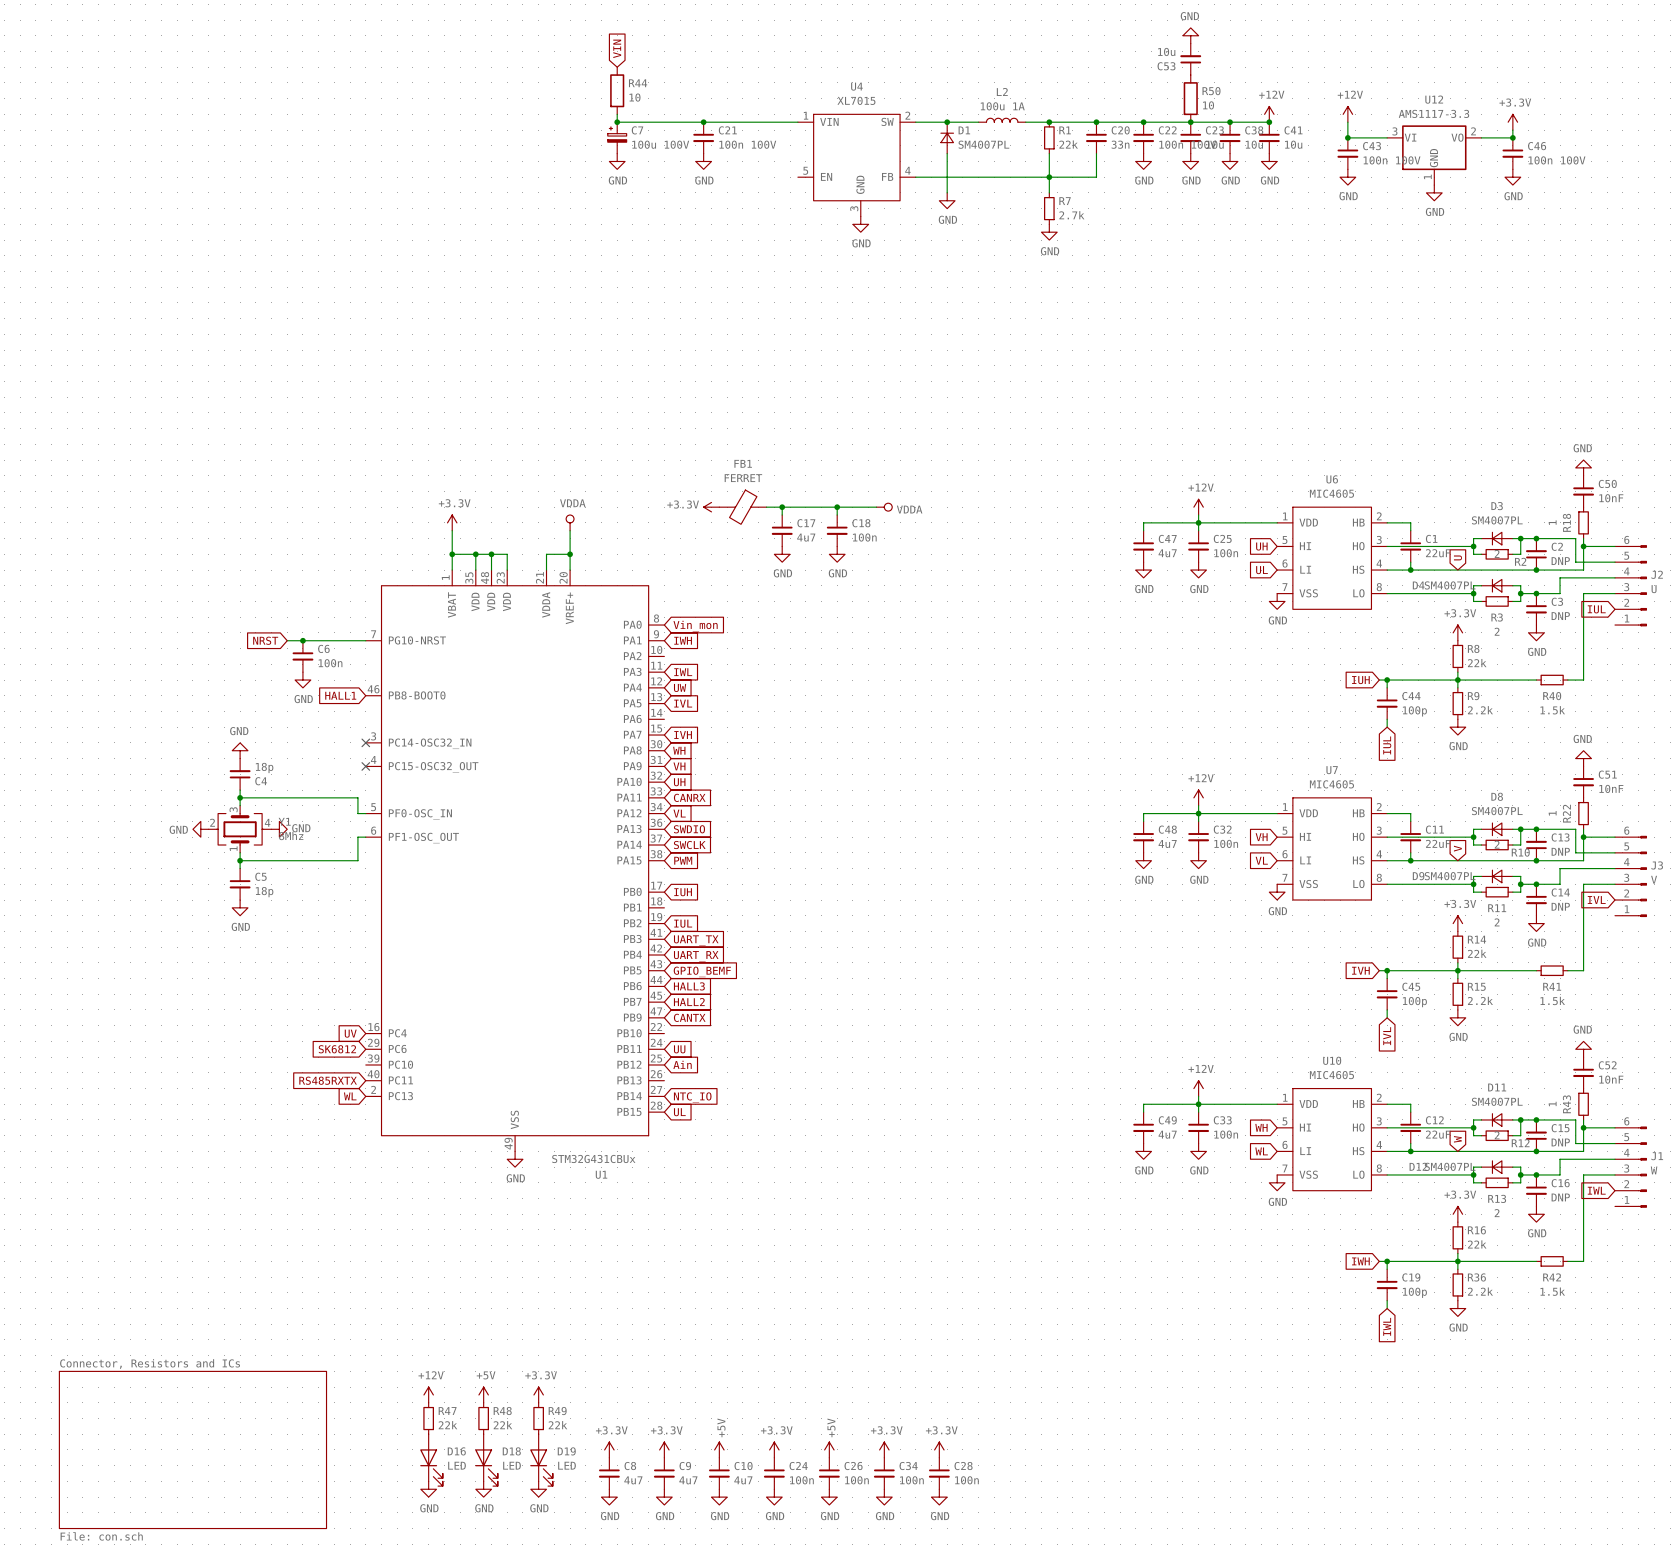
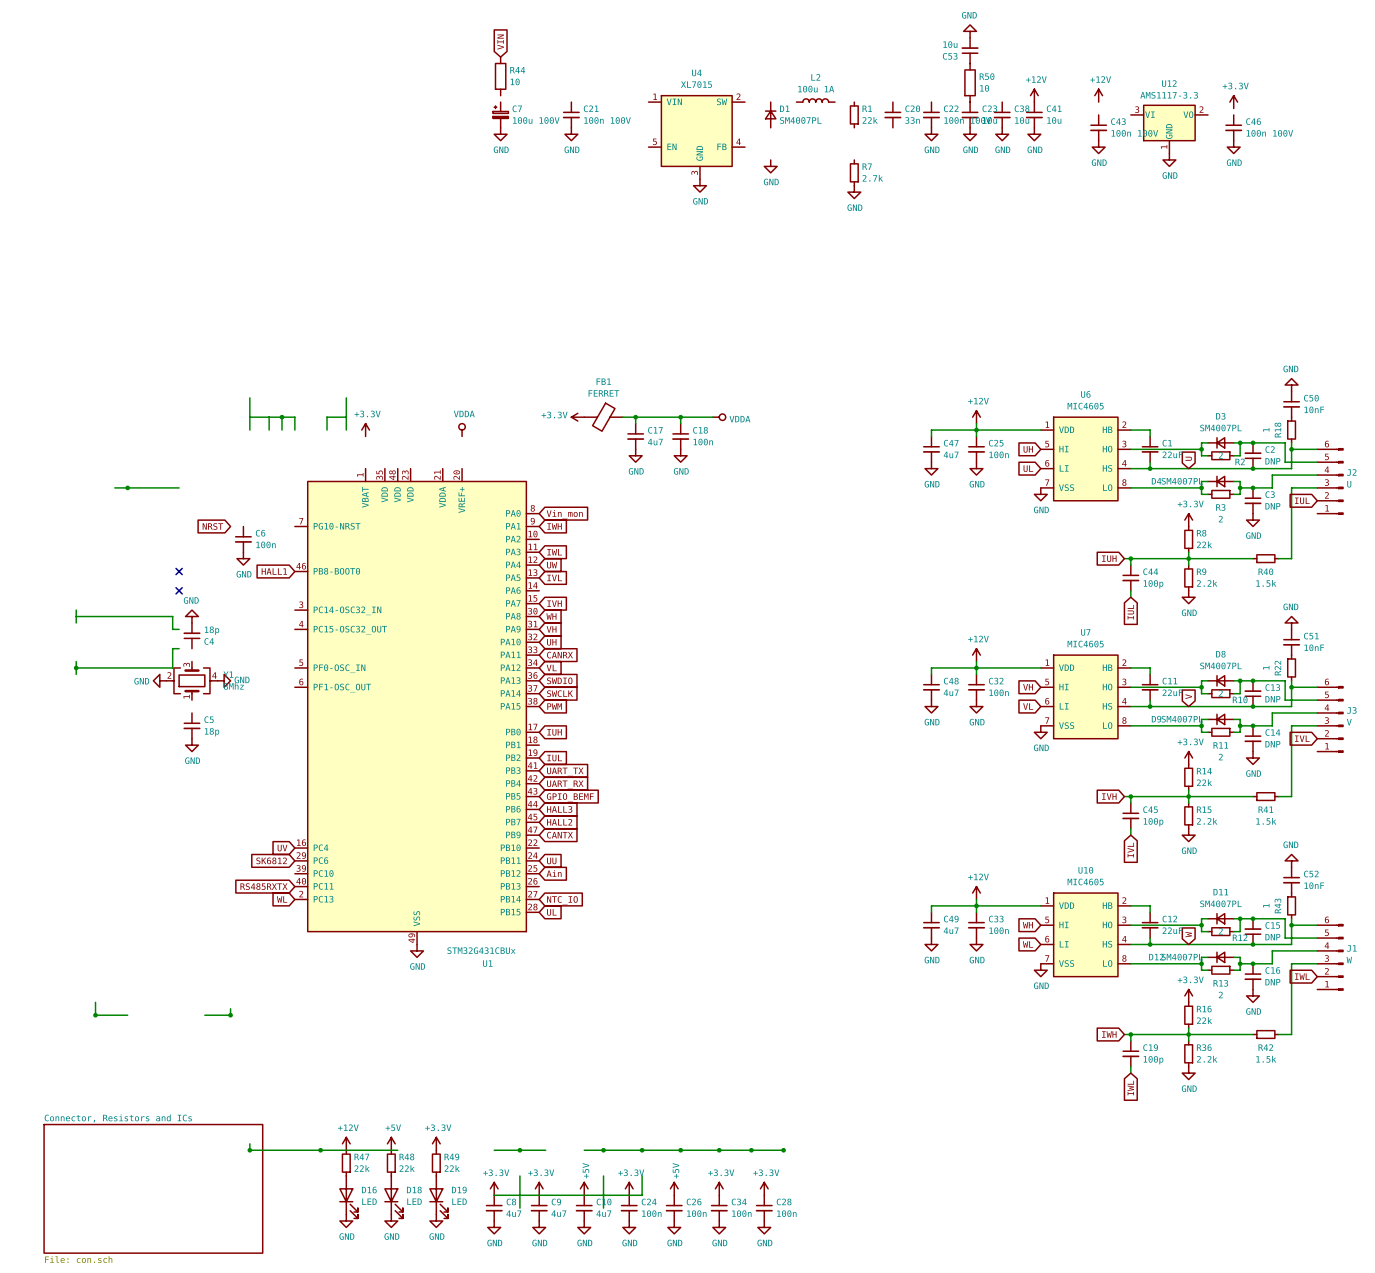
wire: (617, 114) (617, 122) (797, 122) -> none
junction: (617, 122) -> none
junction: (703, 122) -> none
wire: (915, 122) (978, 122) -> none
junction: (947, 122) -> none
wire: (1025, 122) (1269, 122) -> none
junction: (1049, 122) -> none
junction: (1096, 122) -> none
junction: (1143, 122) -> none
junction: (1190, 122) -> none
junction: (1230, 122) -> none
junction: (1269, 122) -> none
wire: (1347, 122) (1347, 137) (1387, 137) -> none
wire: (1512, 130) (1512, 137) (1481, 137) -> none
junction: (1347, 137) -> none
junction: (1512, 137) -> none
wire: (947, 153) (947, 192) -> none
wire: (1049, 153) (1049, 192) -> none
wire: (1096, 153) (1096, 177) (915, 177) -> none
junction: (1049, 177) -> none
junction: none -> (282, 417)
wire: (452, 530) (452, 570) -> (249, 397) (249, 430)
wire: (570, 530) (570, 570) -> (346, 397) (346, 430)
wire: (452, 554) (507, 554) (507, 570) -> (249, 417) (294, 417) (294, 430)
junction: (452, 554) -> none
wire: (475, 554) (475, 570) -> (269, 417) (269, 430)
junction: (475, 554) -> none
wire: (491, 554) (491, 570) -> (282, 417) (282, 430)
junction: (491, 554) -> none
wire: (570, 554) (546, 554) (546, 570) -> (346, 417) (327, 417) (327, 430)
junction: (570, 554) -> none
junction: none -> (127, 487)
wire: (287, 640) (365, 640) -> (114, 487) (179, 487)
junction: (302, 640) -> none
no-connect mark: none -> (179, 571)
no-connect mark: none -> (179, 590)
no-connect mark: (365, 742) -> none
no-connect mark: (365, 766) -> none
wire: (240, 790) (240, 805) -> (76, 610) (76, 622)
wire: (240, 797) (357, 797) (357, 813) (365, 813) -> (76, 616) (172, 616) (172, 629) (179, 629)
junction: (240, 797) -> none
junction: none -> (76, 667)
wire: (365, 837) (357, 837) (357, 860) (240, 860) -> (179, 648) (172, 648) (172, 667) (76, 667)
wire: (240, 852) (240, 868) -> (76, 661) (76, 674)
junction: (240, 860) -> none
wire: none -> (95, 1002) (95, 1015) (127, 1015)
wire: none -> (230, 1008) (230, 1015) (204, 1015)
junction: none -> (95, 1015)
junction: none -> (230, 1015)
wire: none -> (249, 1143) (249, 1150) (397, 1150)
junction: none -> (249, 1150)
junction: none -> (320, 1150)
wire: none -> (494, 1150) (545, 1150)
junction: none -> (519, 1150)
wire: none -> (584, 1150) (783, 1150)
junction: none -> (603, 1150)
junction: none -> (642, 1150)
junction: none -> (680, 1150)
junction: none -> (719, 1150)
junction: none -> (751, 1150)
junction: none -> (783, 1150)
wire: none -> (519, 1175) (519, 1208)
wire: none -> (603, 1175) (603, 1208)
wire: none -> (642, 1175) (642, 1195) (494, 1195)

